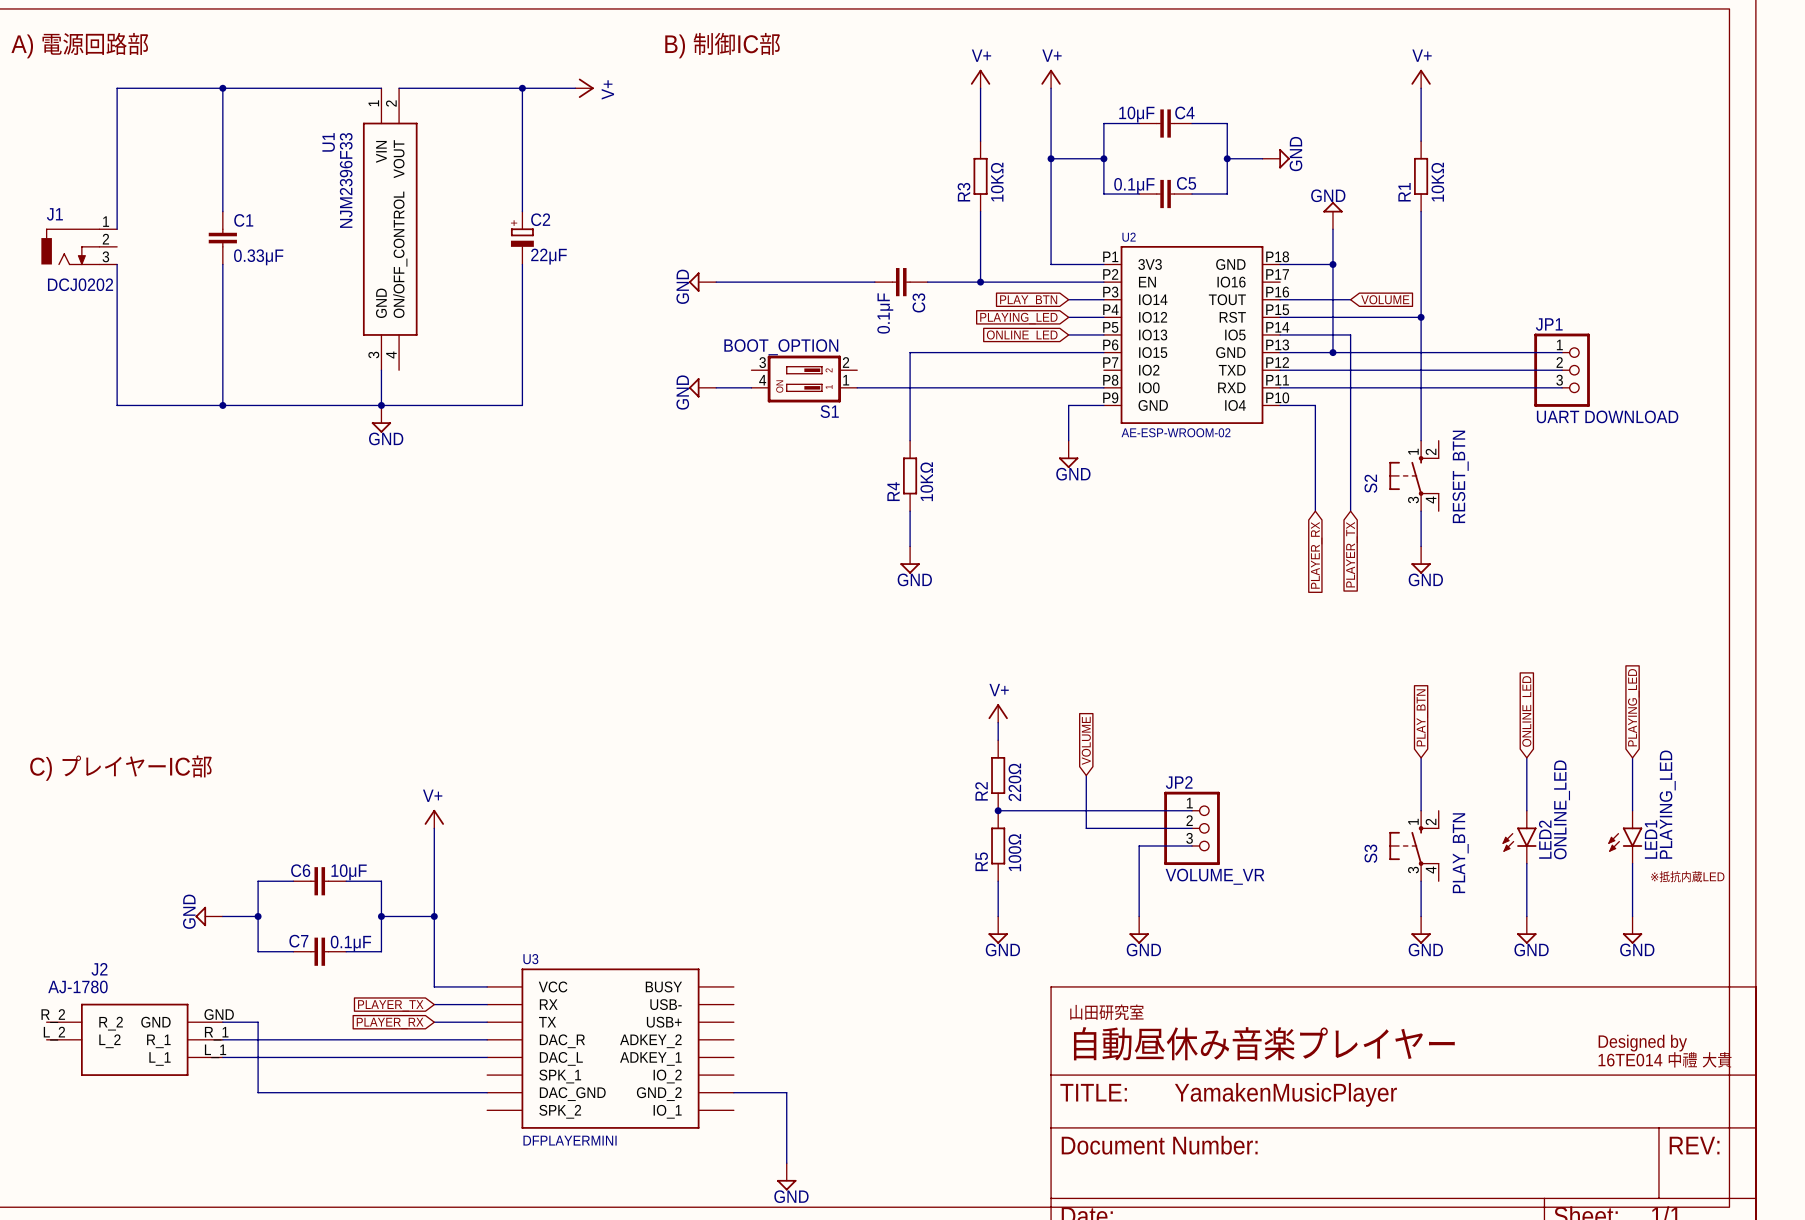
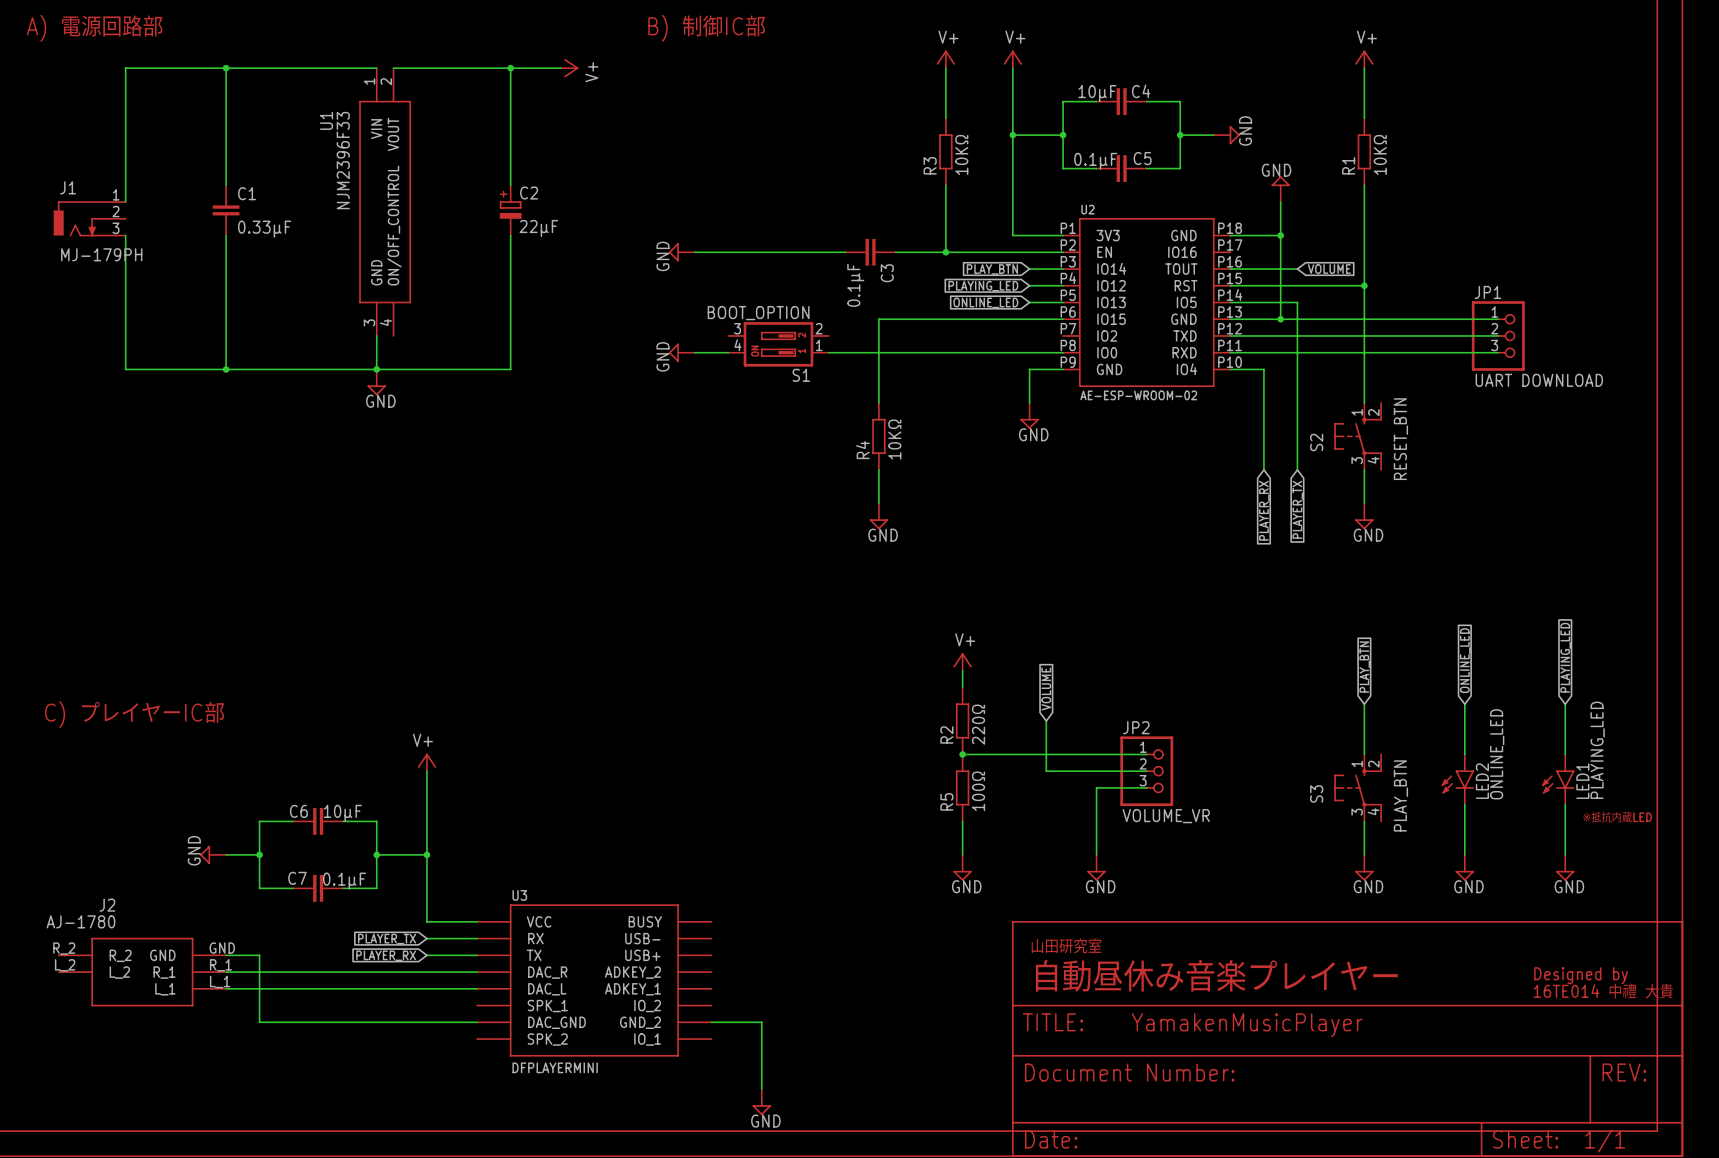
J1 value: DCJ0202 (80, 284) -> MJ-179PH (101, 254)

